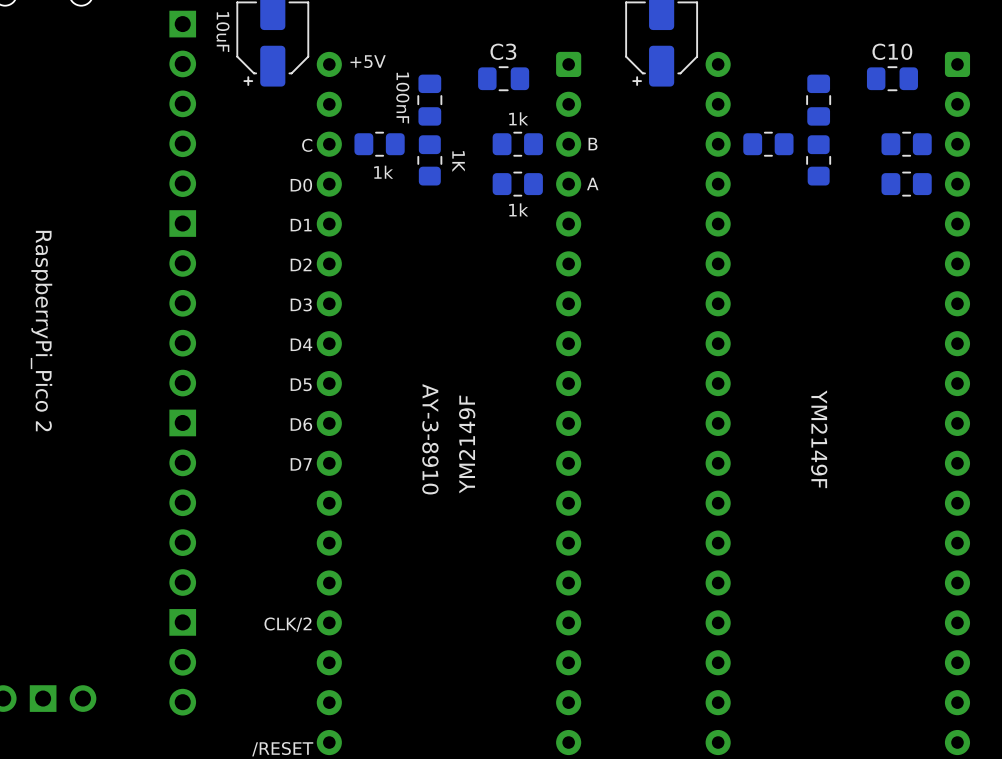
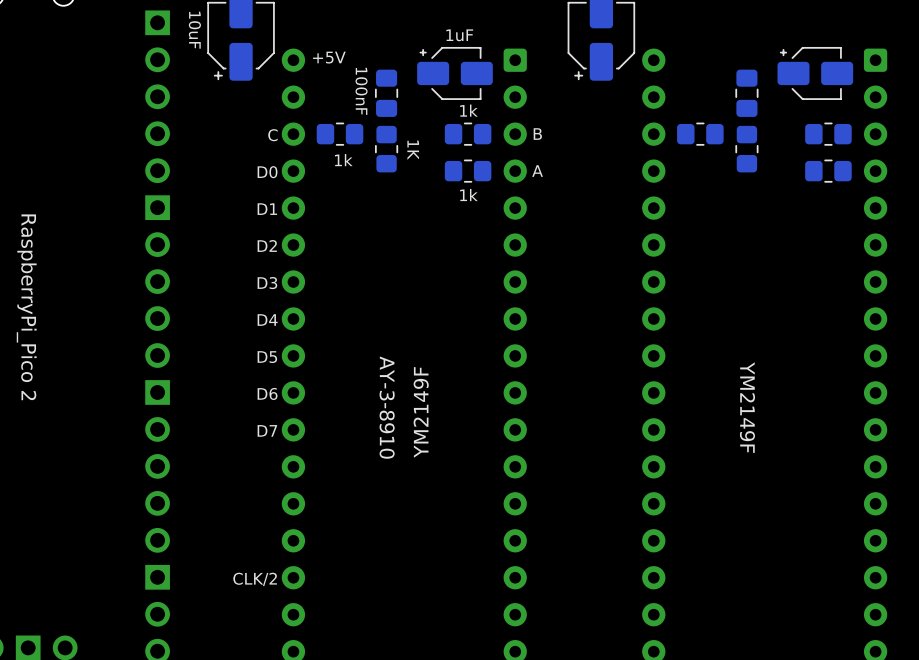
C3: (503, 78) -> none
part: none -> 1uF (454, 73)
C10: (892, 78) -> none
part: none -> (815, 73)

